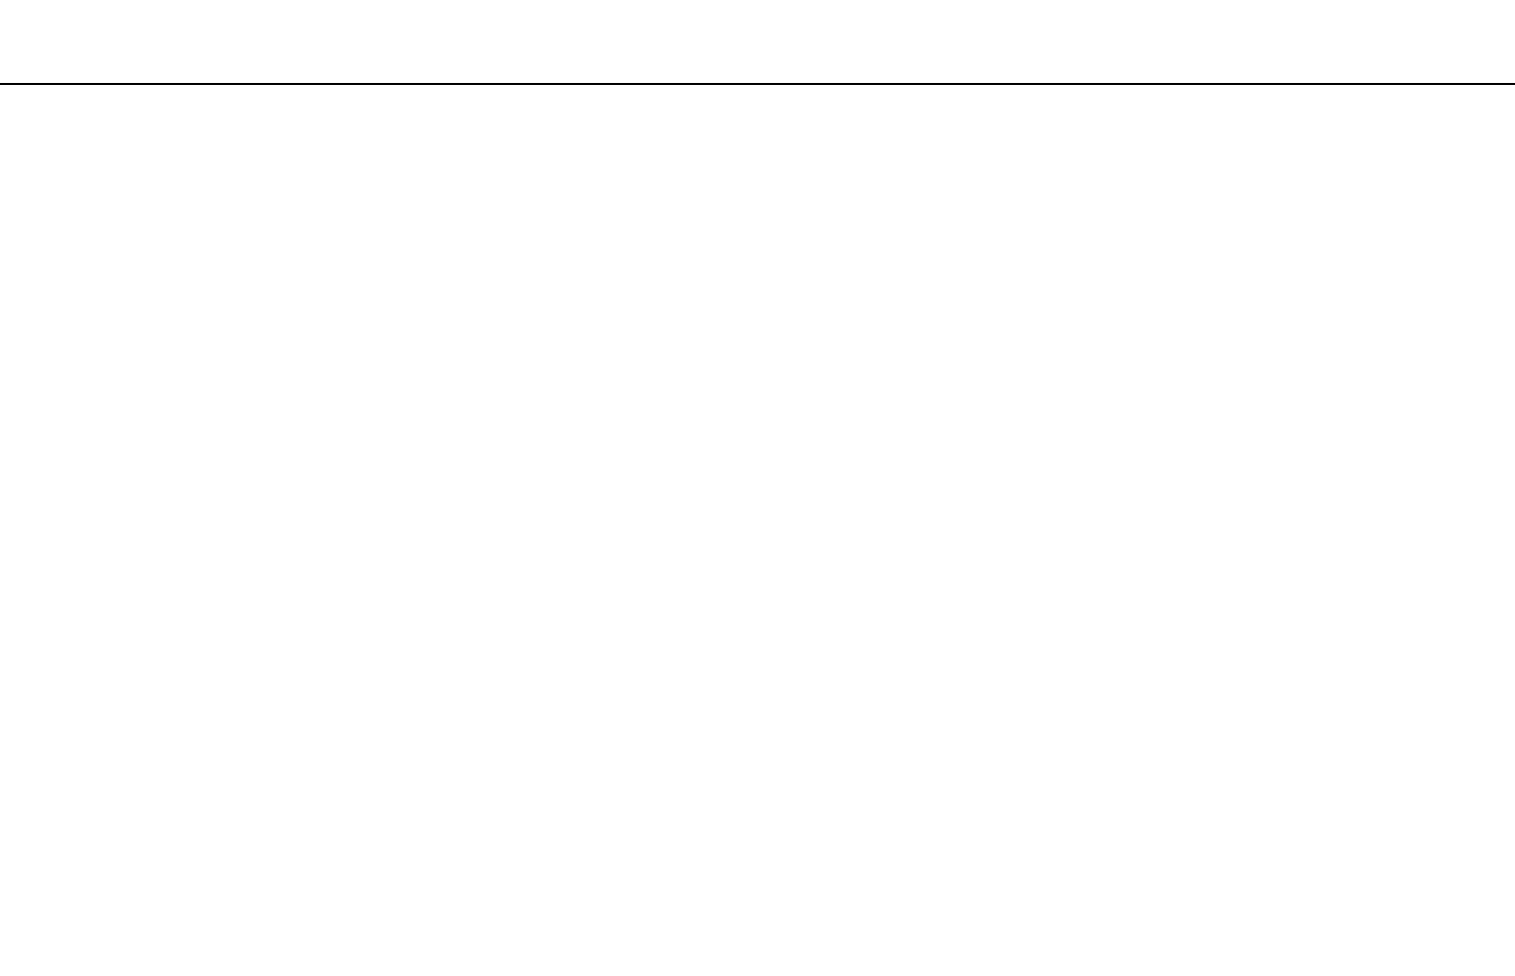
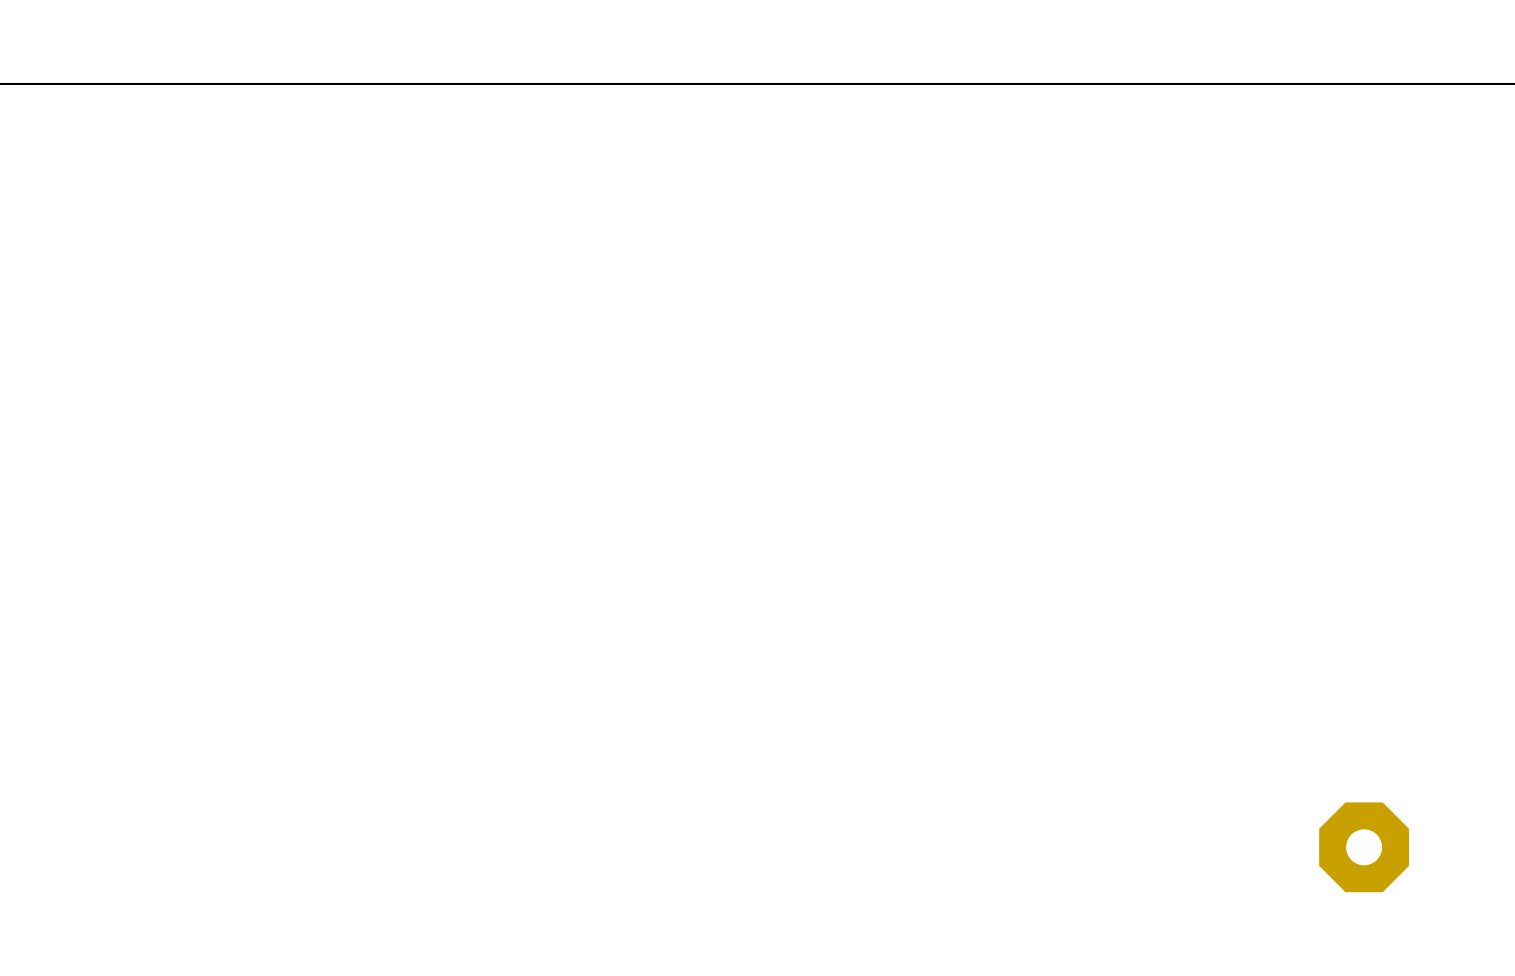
part: none -> (1364, 847)

